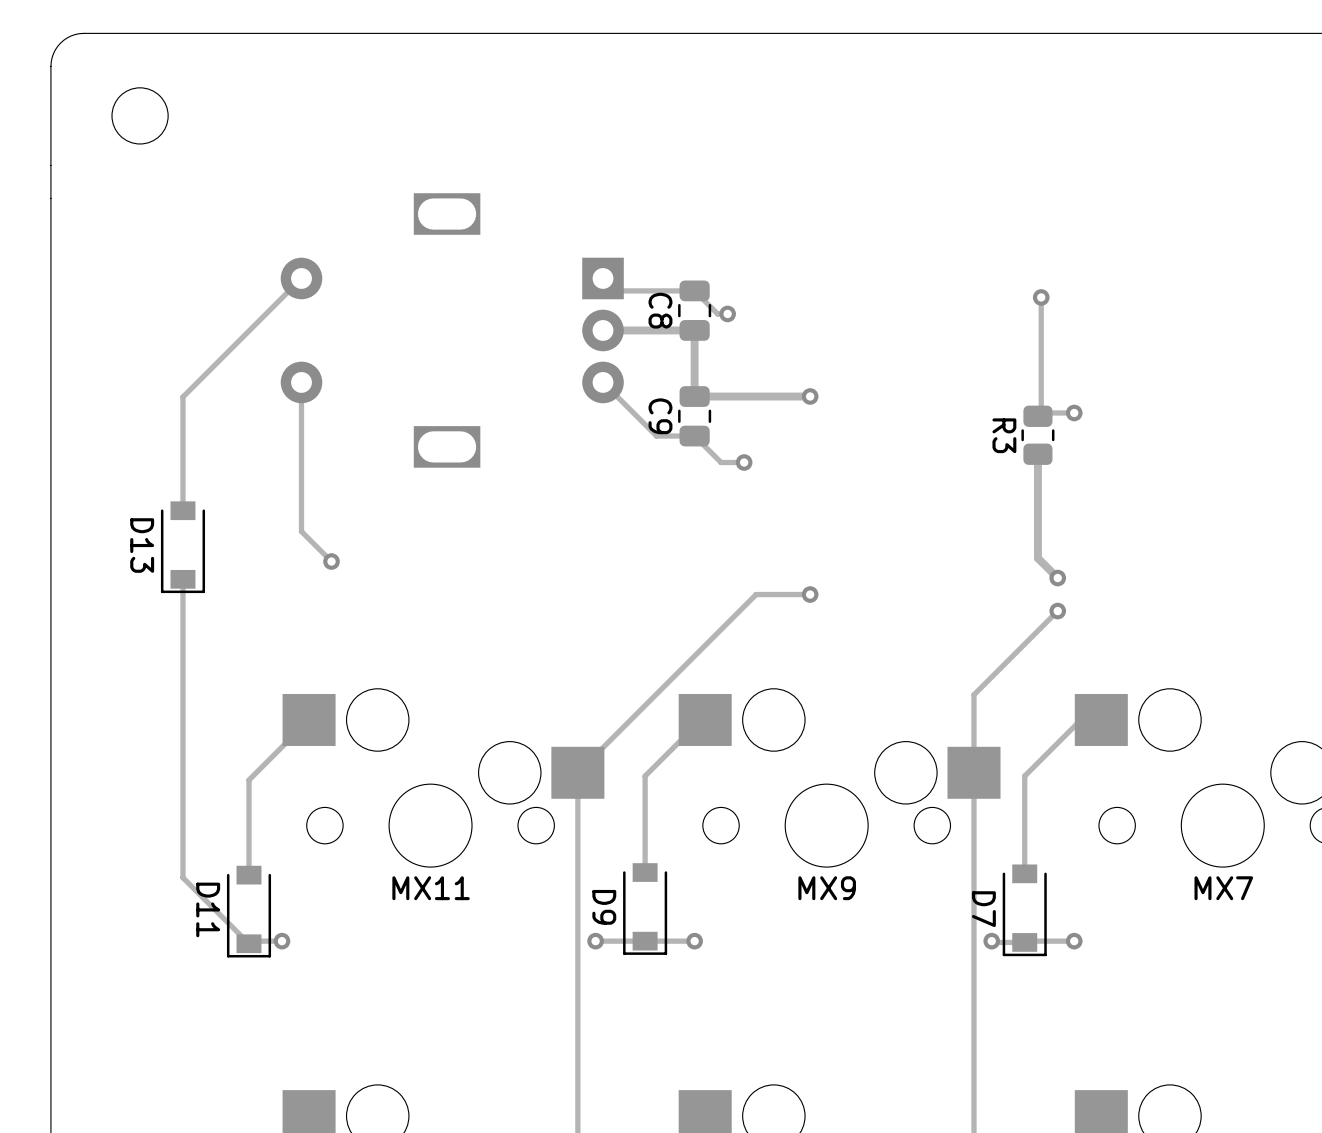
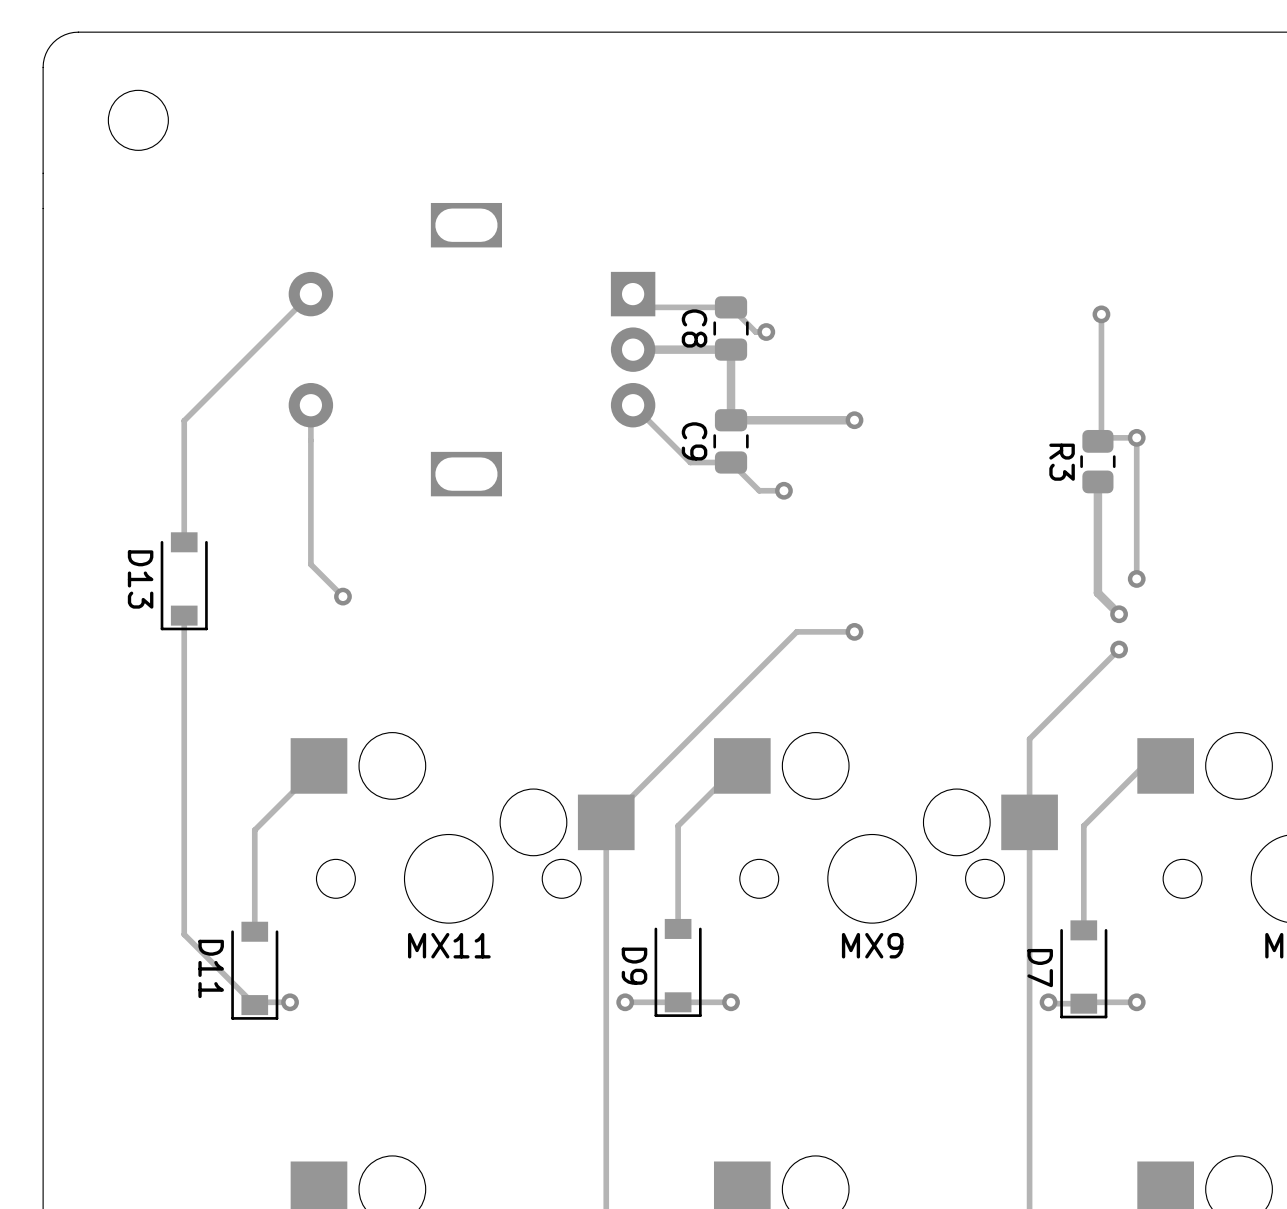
track: none -> (1136, 437) (1136, 578)
via: none -> (1136, 578)

